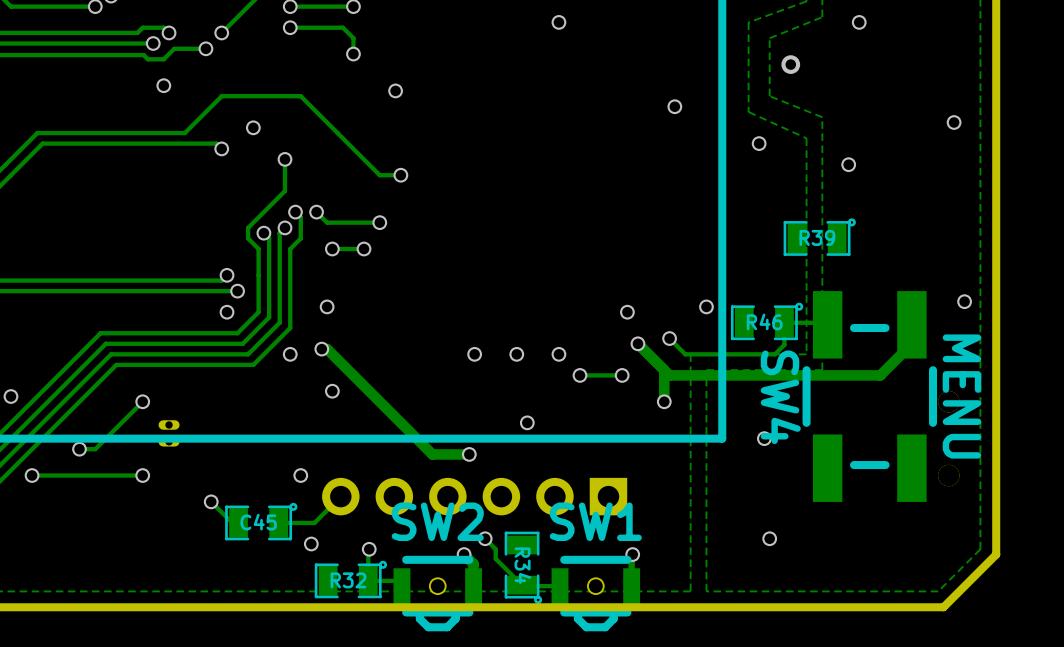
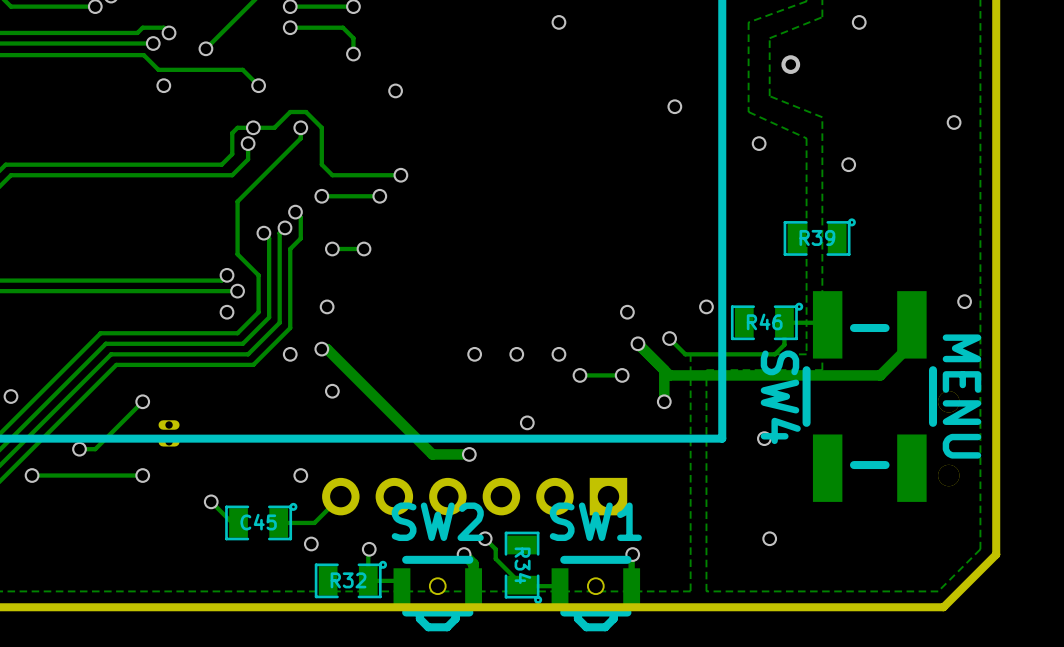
via: (221, 32) -> none
track: none -> (221, 33) (205, 48)
track: (205, 48) (174, 48) (163, 59) (147, 59) -> (258, 85) (242, 69) (158, 69) (147, 59)
via: none -> (258, 85)
via: none -> (300, 127)
via: none -> (248, 143)
track: (221, 148) (216, 143) (42, 143) (10, 175) -> (248, 143) (248, 159) (232, 175) (10, 175)
via: (221, 148) -> none
track: (284, 159) (284, 191) (248, 227) (248, 238) (258, 248) (258, 275) -> (300, 127) (300, 138) (237, 201) (237, 254) (258, 275)
via: (284, 159) -> none
track: (5, 164) (37, 133) (184, 133) (221, 96) (300, 96) (379, 175) -> (5, 164) (221, 164) (232, 154) (232, 133) (237, 127) (274, 127) (290, 112) (306, 112) (321, 127) (321, 164) (332, 175) (379, 175)
track: none -> (379, 196) (321, 196)
track: (316, 212) (327, 222) (379, 222) -> none
via position: (316, 212) -> (321, 196)
via position: (379, 222) -> (379, 196)

